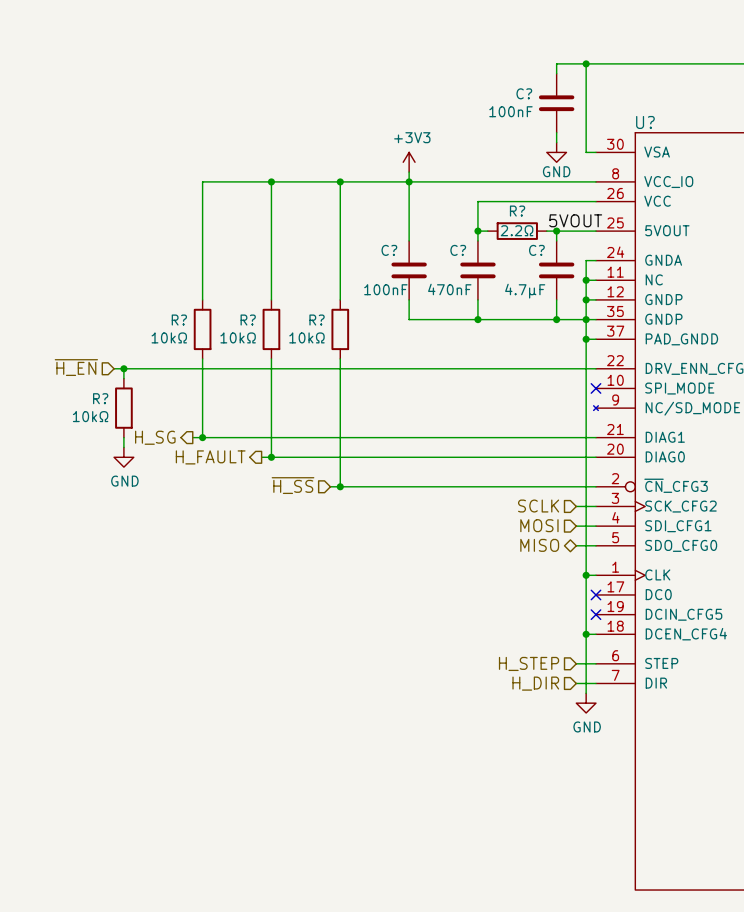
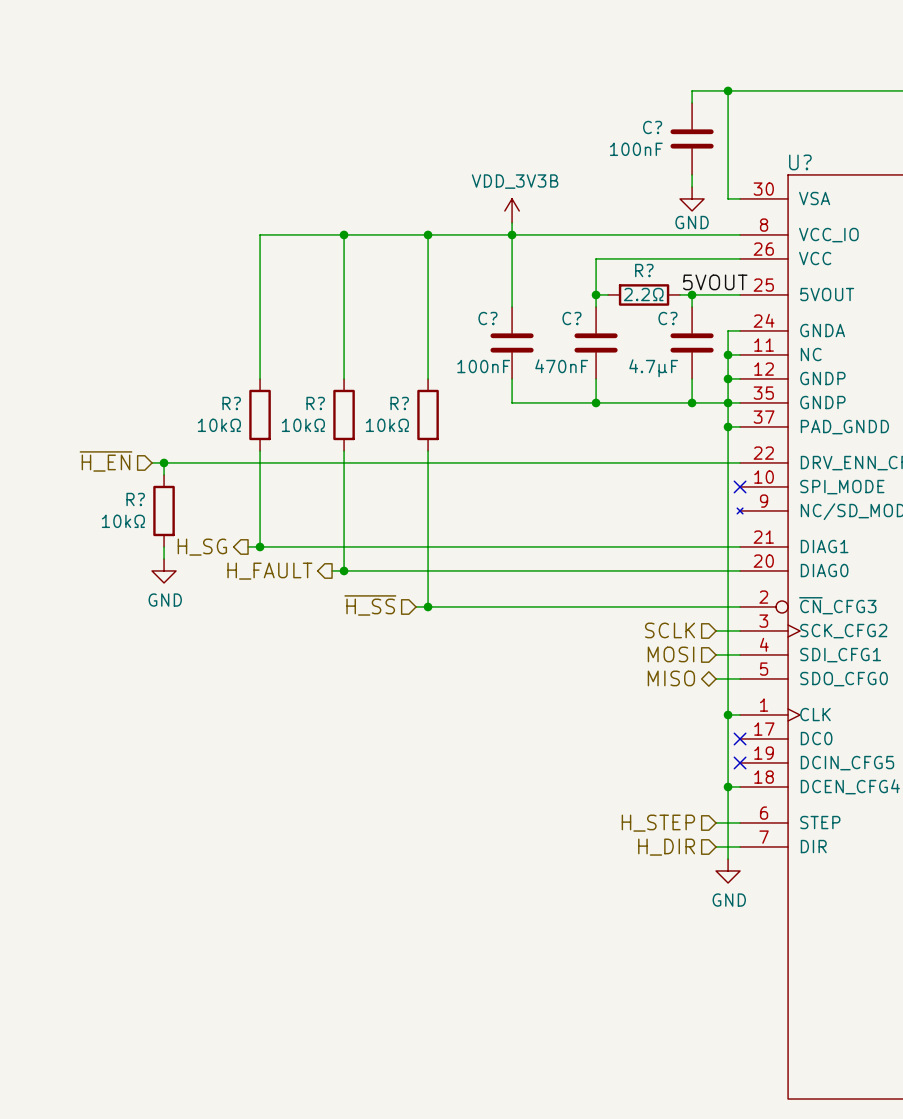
power symbol: +3V3 (409, 162) -> VDD_3V3B (512, 210)

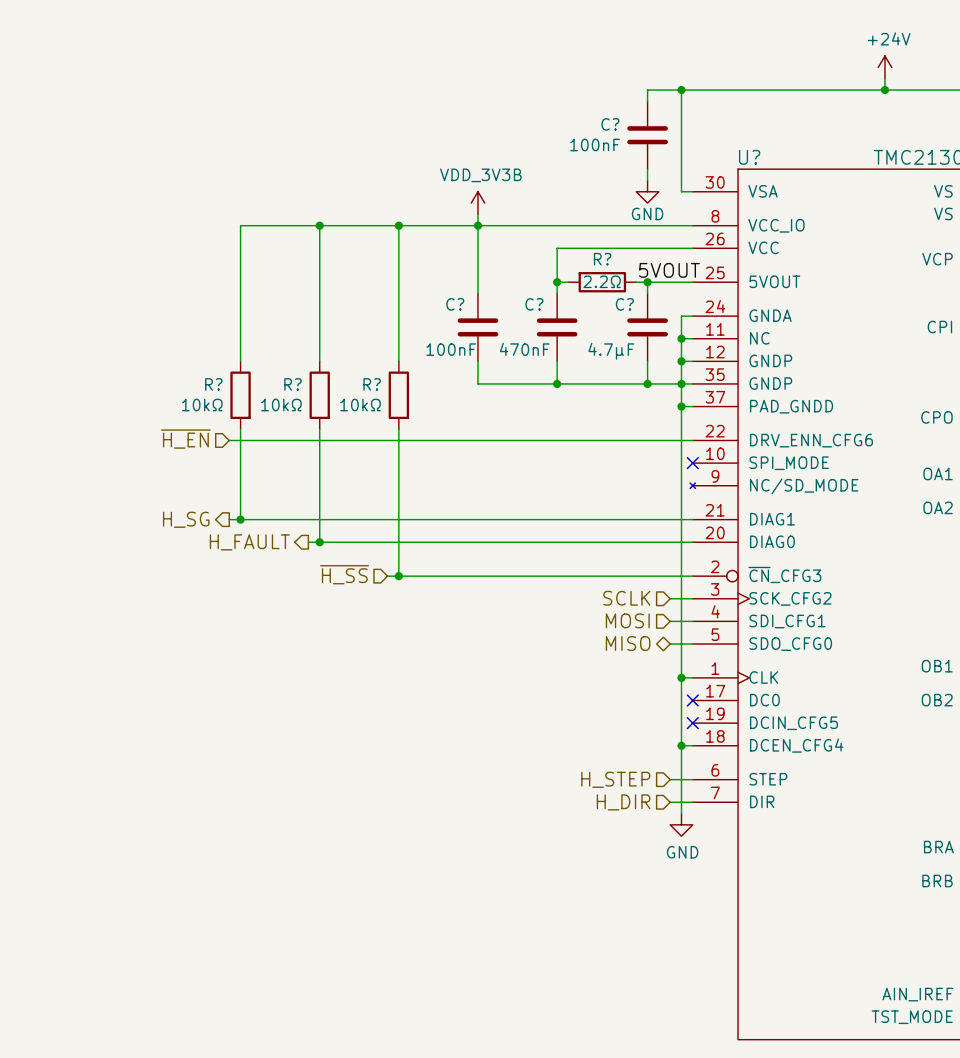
hierarchical label position: ~{H_EN} (106, 461) -> ~{H_EN} (185, 439)
wire: (152, 462) (248, 462) -> none
wire: (164, 462) (164, 474) -> none
junction: (164, 462) -> none
R?: 10kΩ (164, 510) -> none
wire: (164, 546) (164, 558) -> none
power symbol: GND (164, 570) -> none

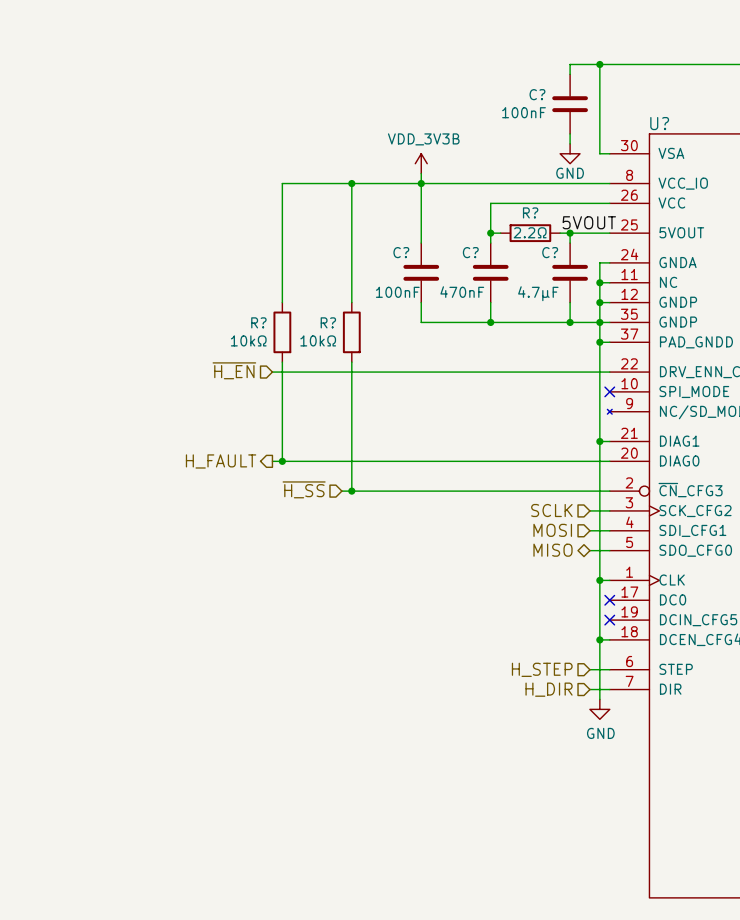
wire: (319, 225) (240, 225) (240, 361) -> none
junction: (319, 225) -> none
R?: 10kΩ (240, 395) -> none
wire: (240, 429) (240, 519) -> none
hierarchical label position: ~{H_EN} (185, 439) -> ~{H_EN} (234, 370)
wire: (229, 440) (308, 440) -> none
hierarchical label: H_SG (186, 519) -> none
wire: (229, 519) (681, 519) -> none
junction: (240, 519) -> none
junction: none -> (599, 441)

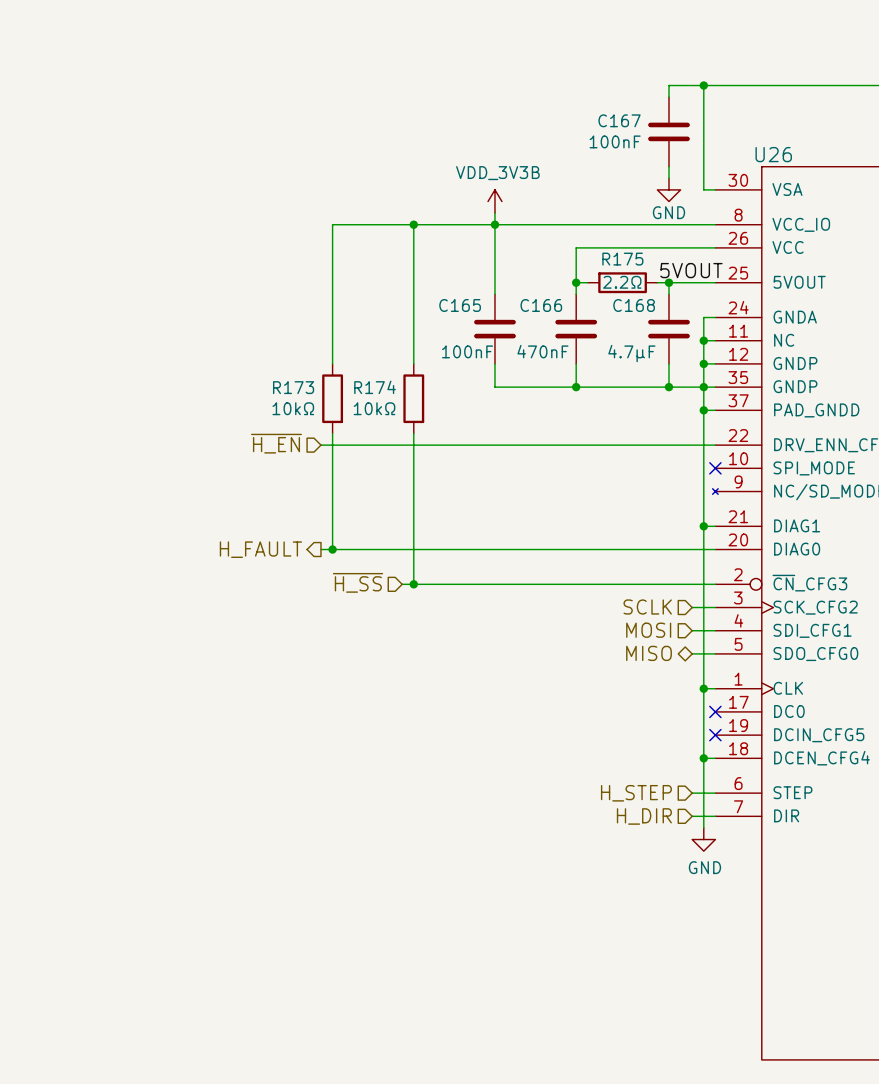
C? name: C? (537, 94) -> C167 (619, 120)
U? name: U? (659, 123) -> U26 (773, 154)
R? name: R? (530, 212) -> R175 (622, 259)
C? name: C? (401, 252) -> C165 (460, 305)
C? name: C? (470, 252) -> C166 (541, 305)
C? name: C? (550, 252) -> C168 (634, 305)
R? name: R? (258, 322) -> R173 (293, 387)
R? name: R? (328, 322) -> R174 (375, 387)

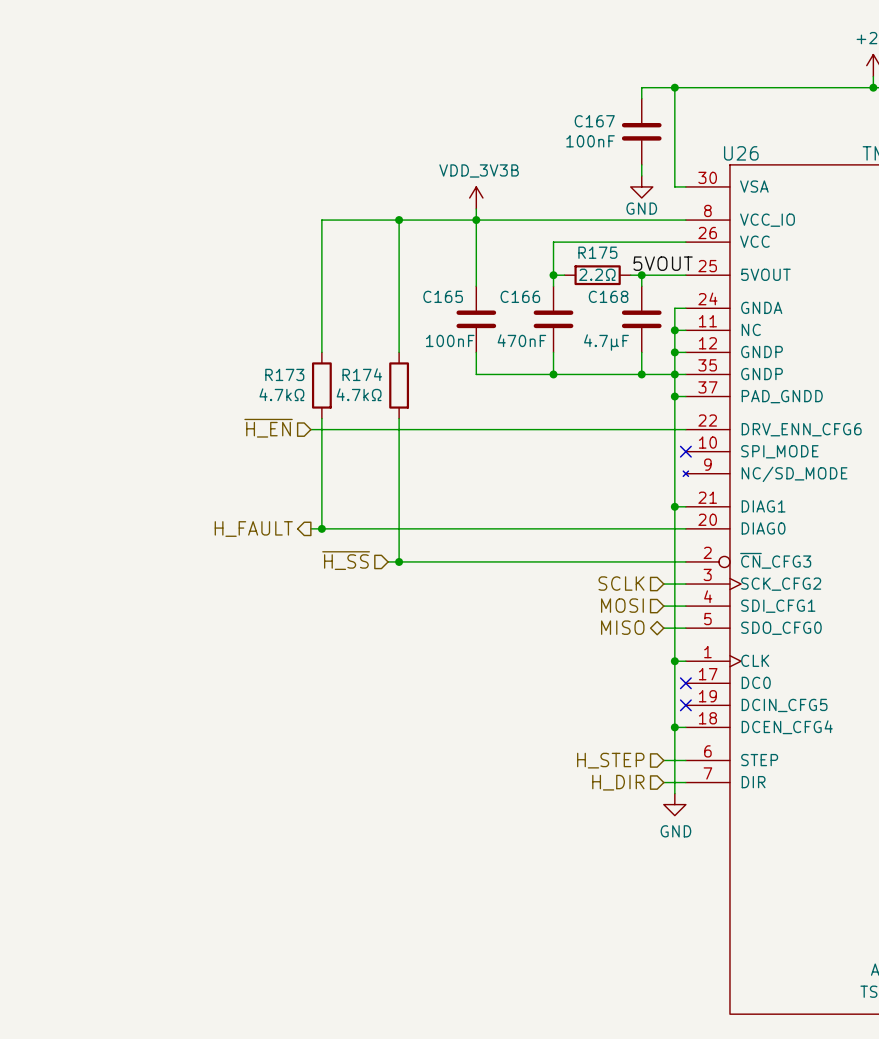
R173 value: 10kΩ (293, 408) -> 4.7kΩ (281, 394)
R174 value: 10kΩ (374, 408) -> 4.7kΩ (359, 394)

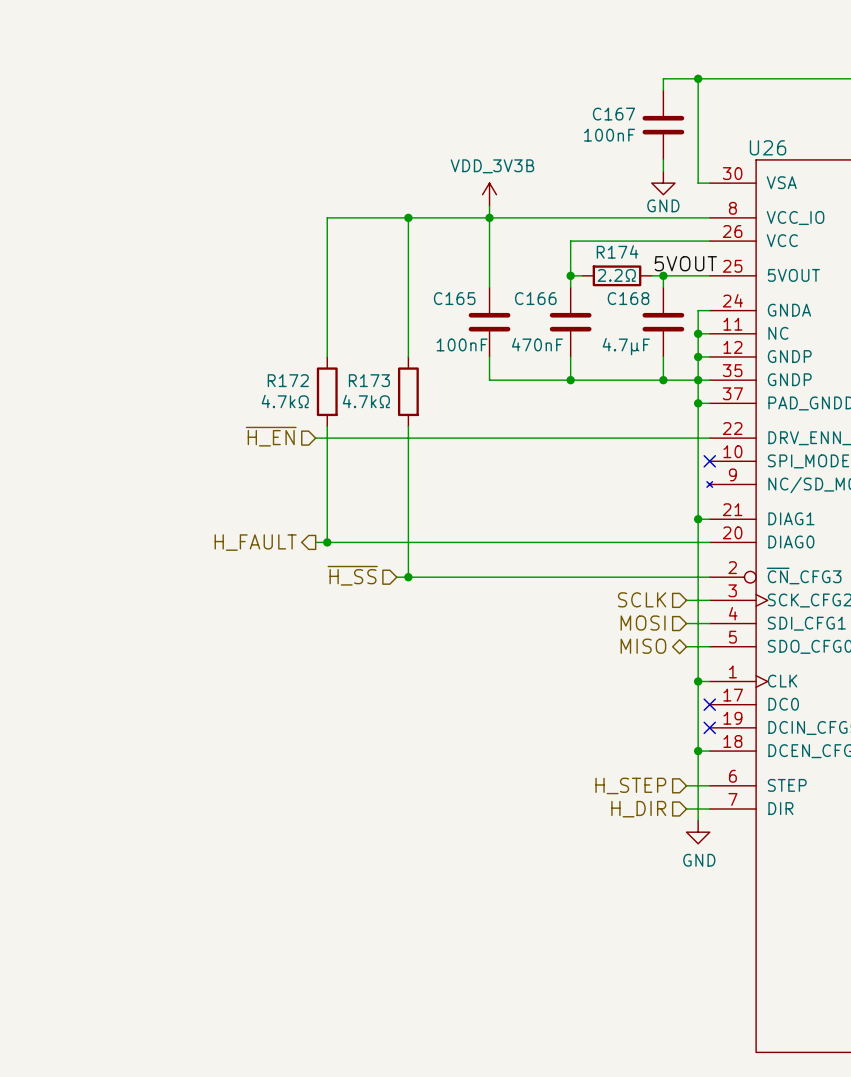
R175 name: R175 (597, 252) -> R174 (617, 251)
R173 name: R173 (284, 374) -> R172 (288, 380)
R174 name: R174 (362, 374) -> R173 (369, 380)

